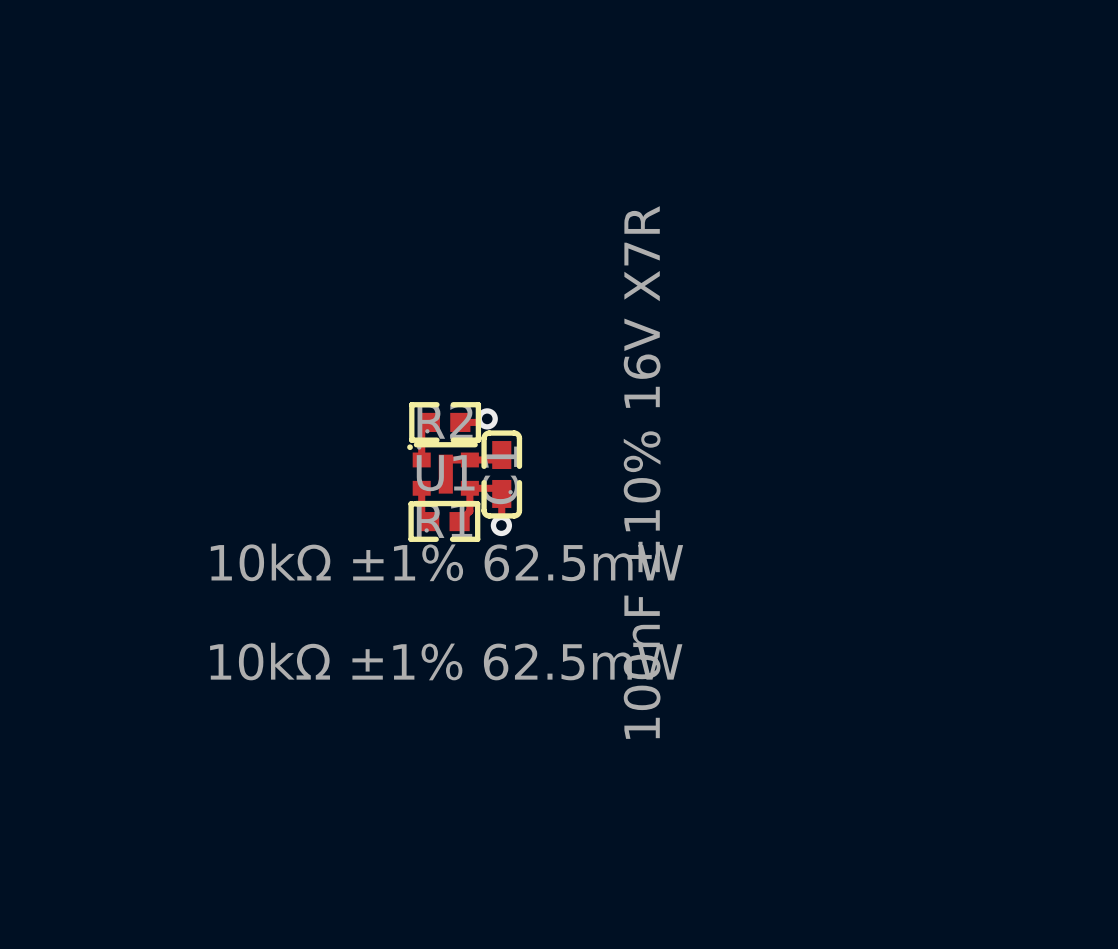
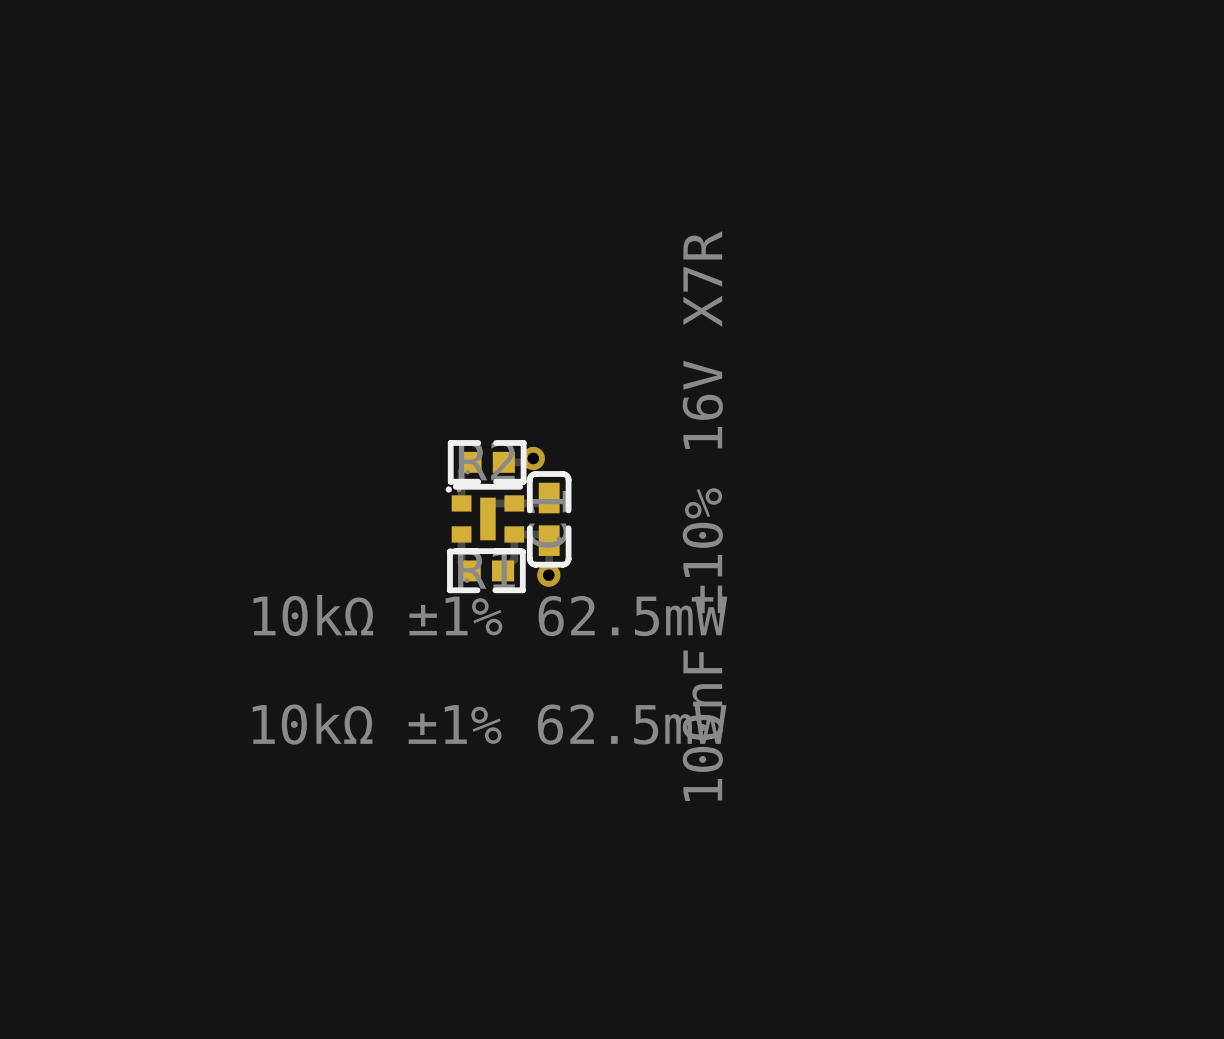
U1 name: U1 (445, 473) -> none

